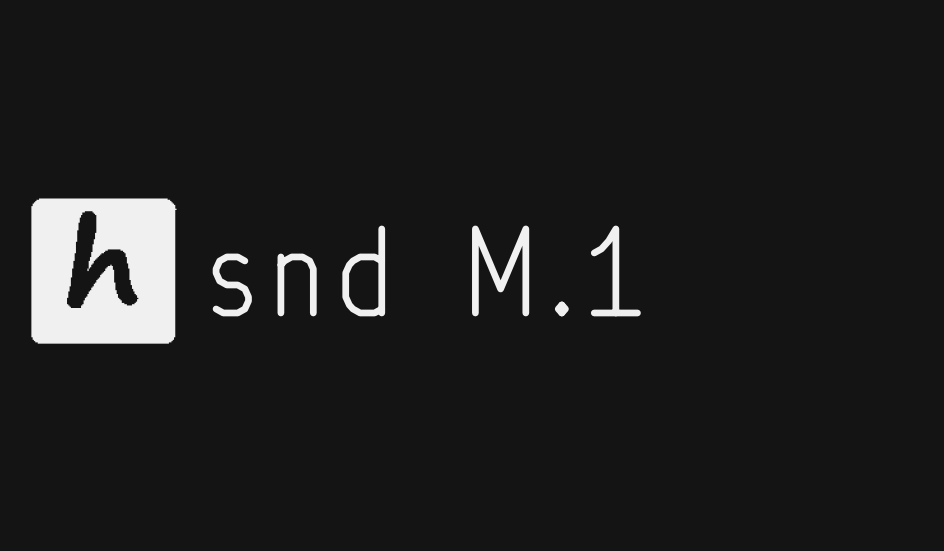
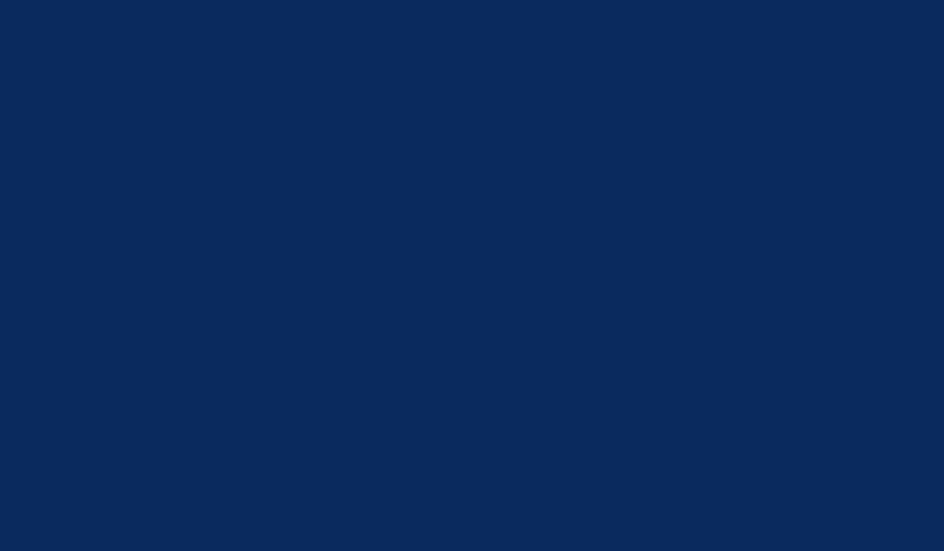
drawing: [31, 198, 177, 344] -> none
text: snd M.1 (426, 270) -> none

